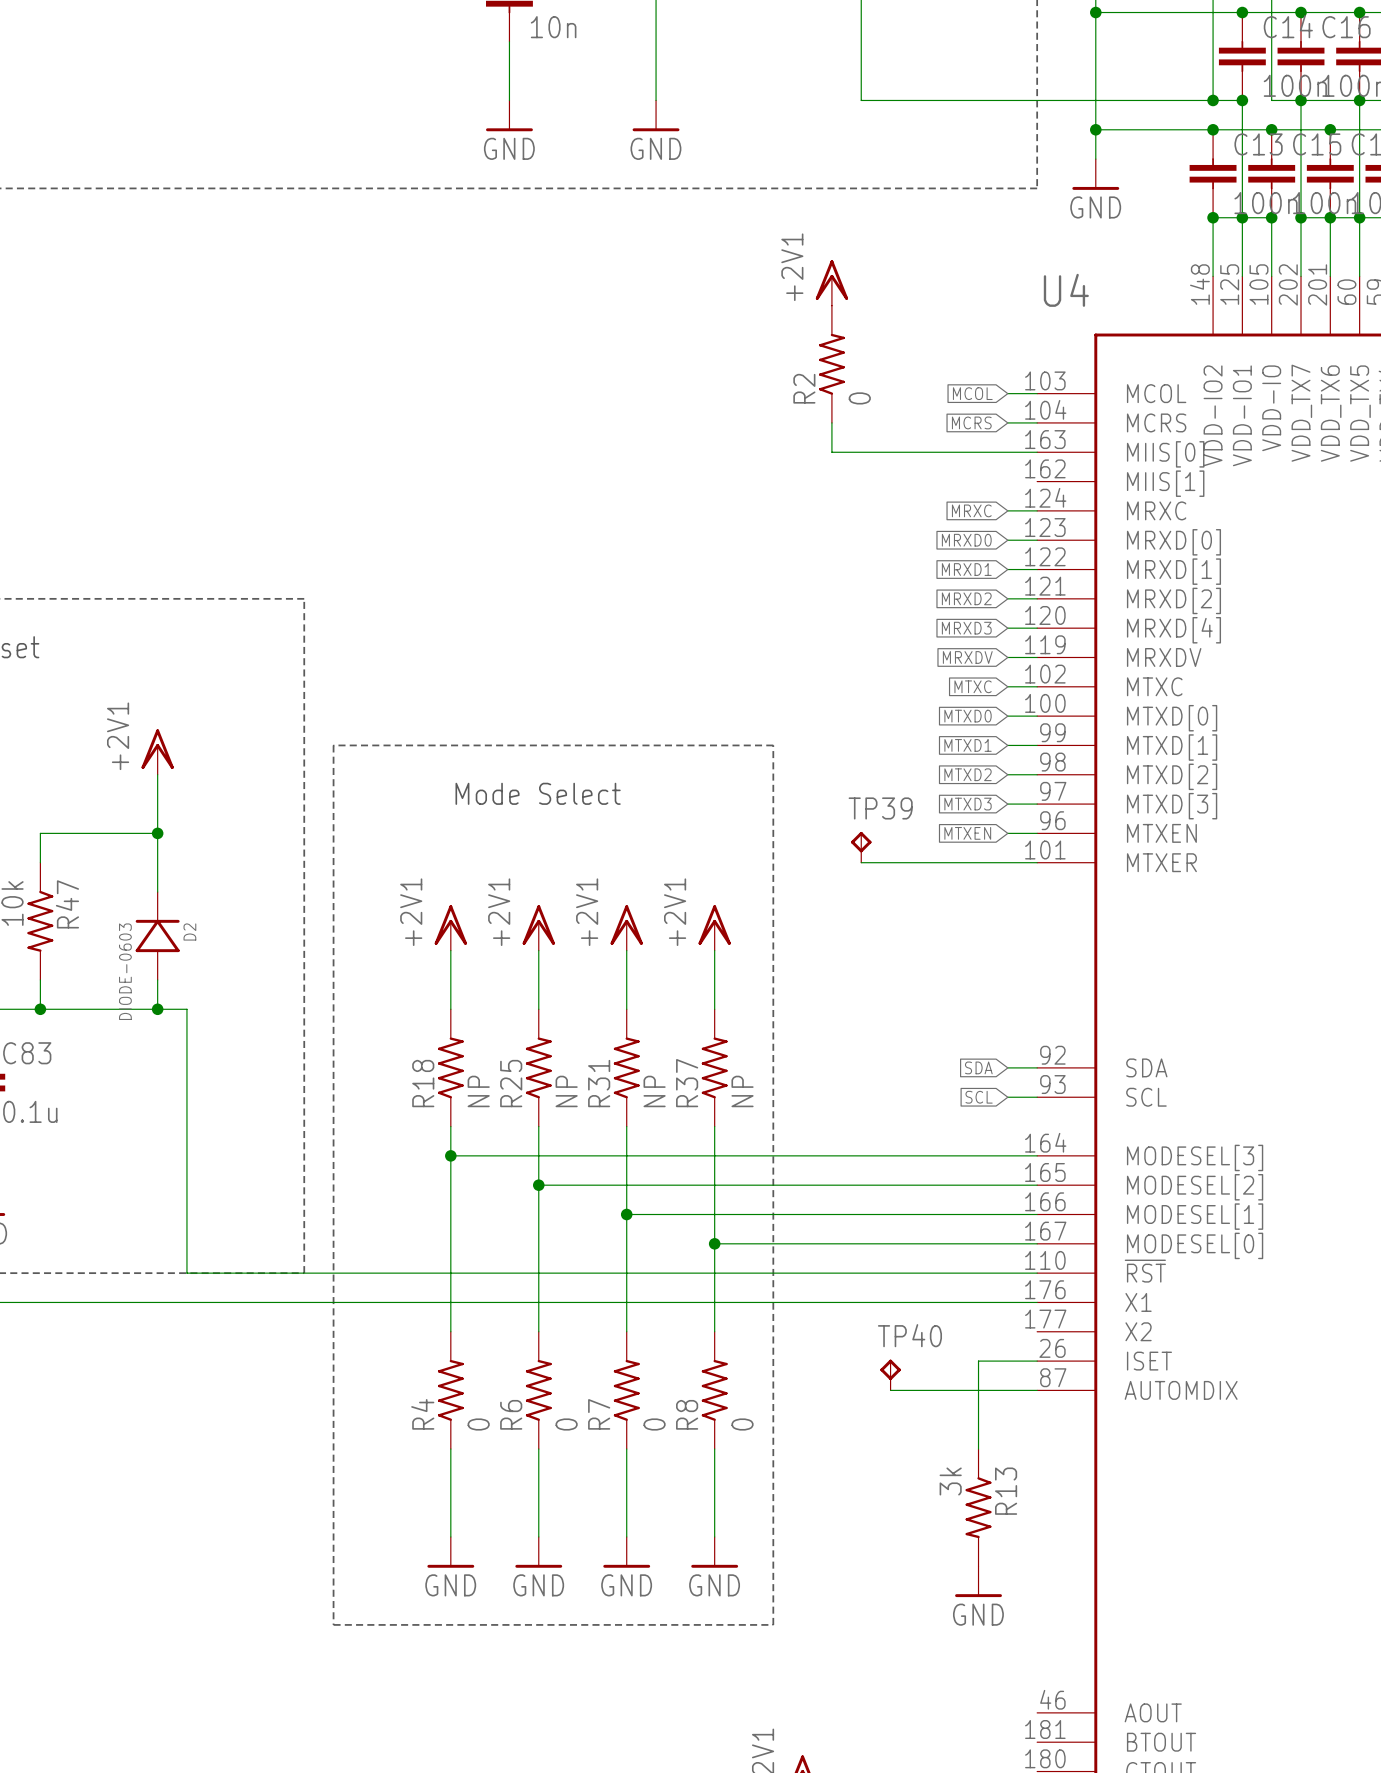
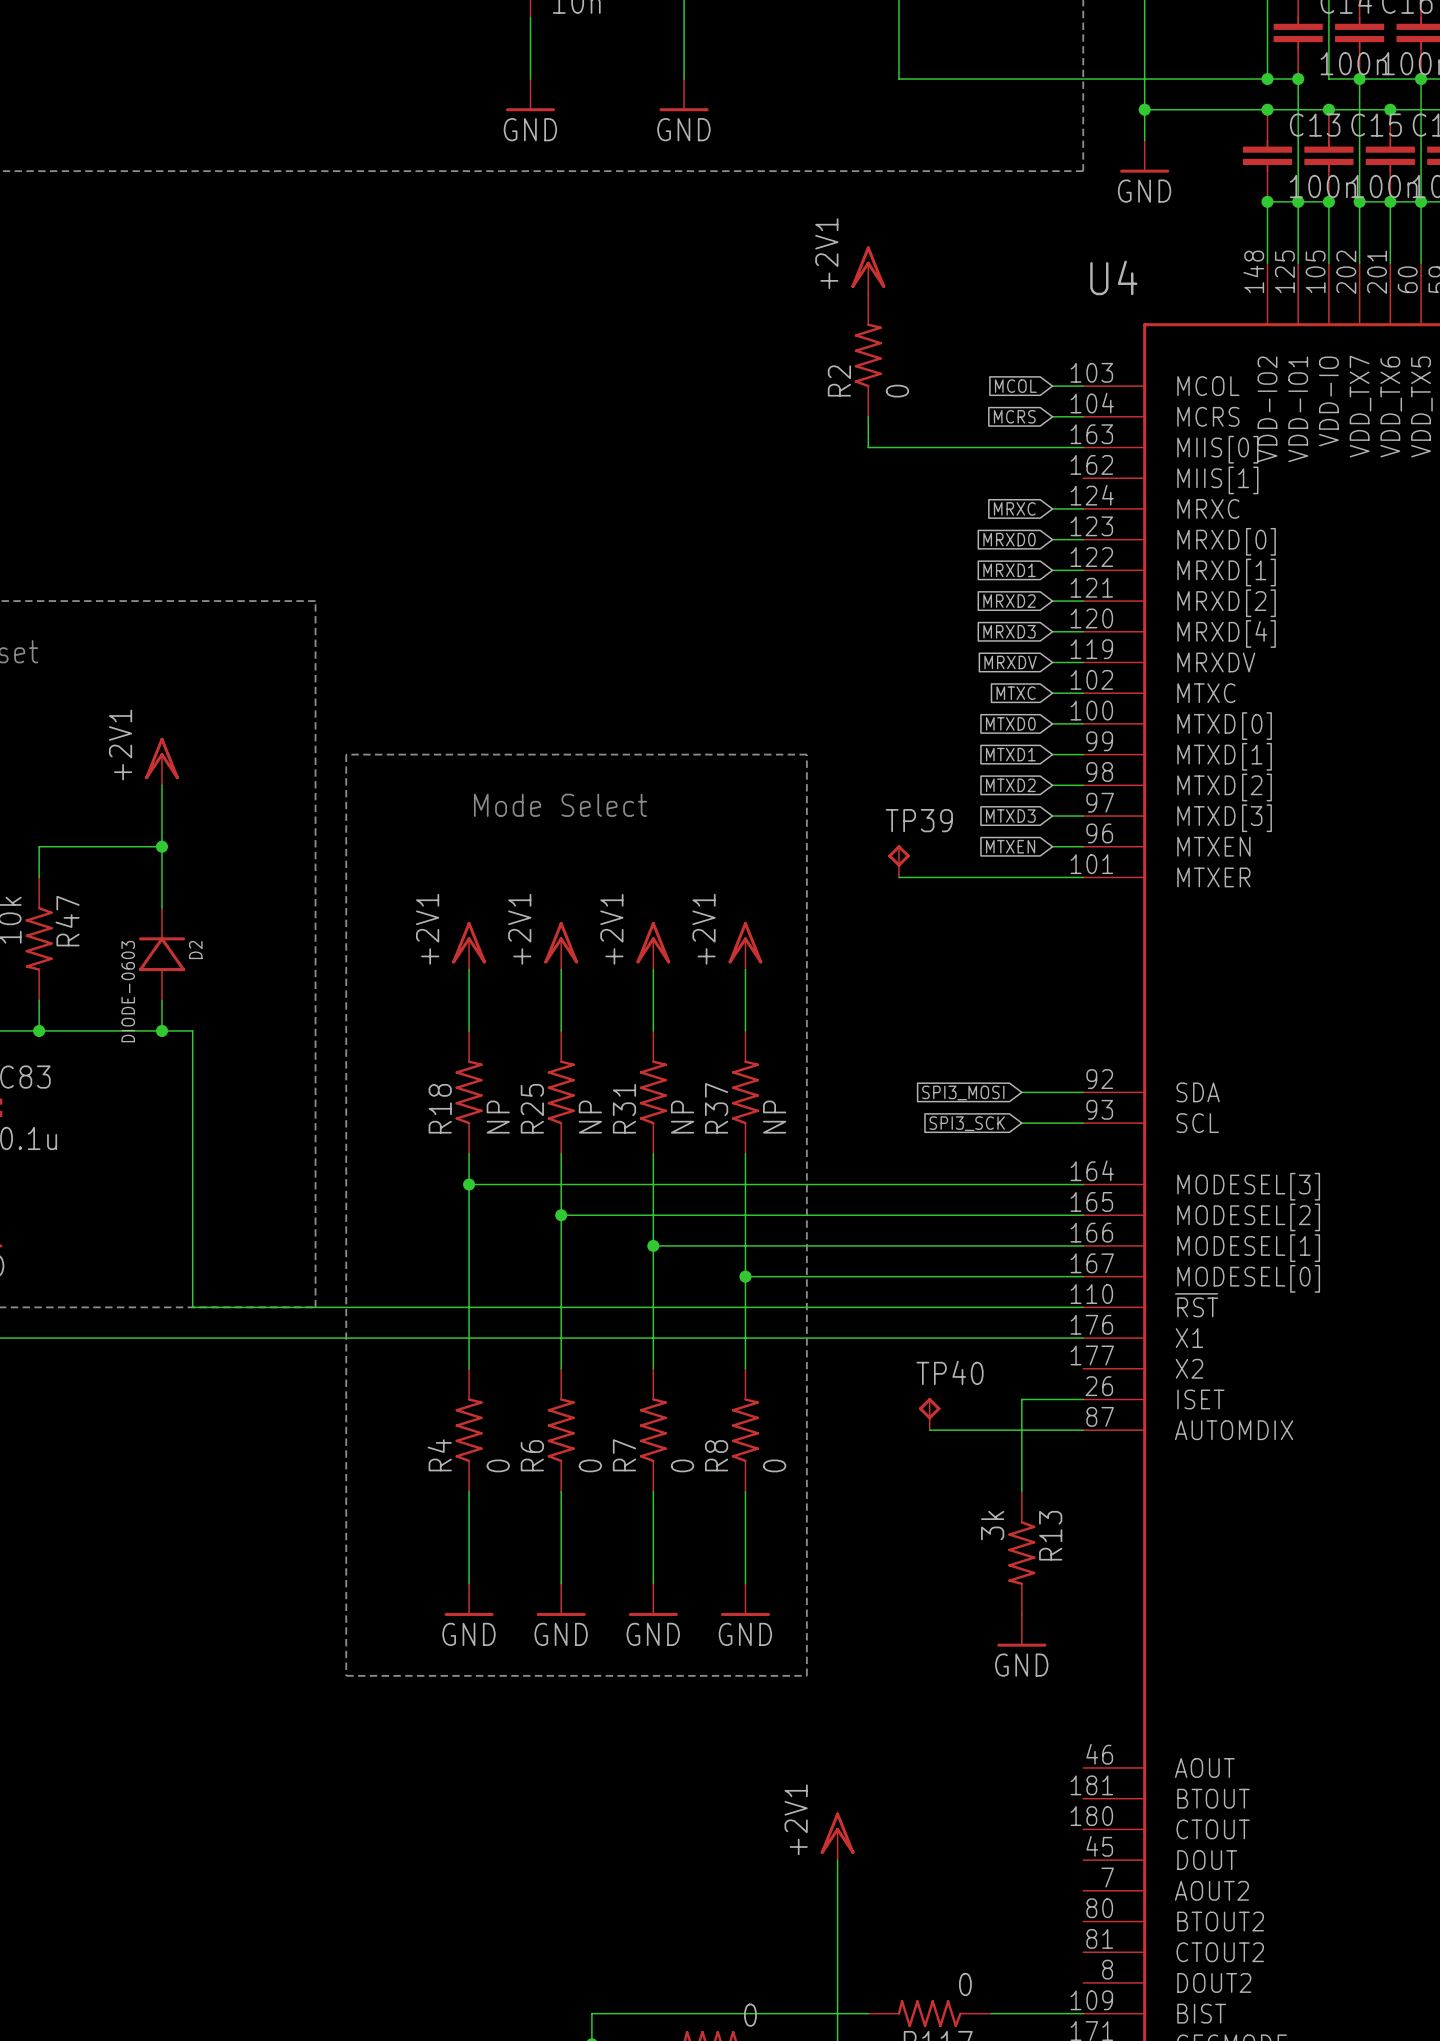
wire: none -> (1021, 1092) (1052, 1092)
global label: SDA (978, 1067) -> none
global label: none -> SPI3_MOSI (963, 1092)
global label: none -> SPI3_SCK (967, 1123)
wire: none -> (1021, 1123) (1052, 1123)
global label: SCL (979, 1097) -> none

